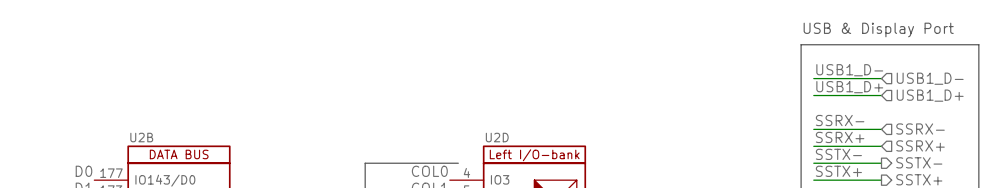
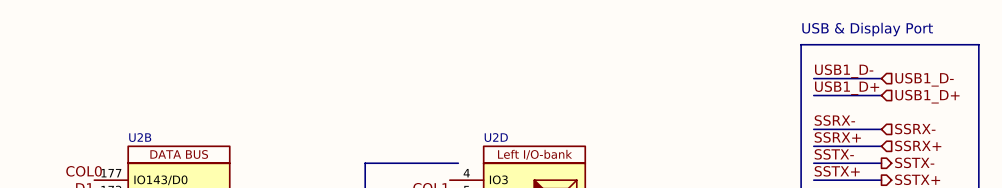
label: none -> COL0 (84, 171)
label: D0 (83, 171) -> none
label: COL0 (429, 171) -> none

